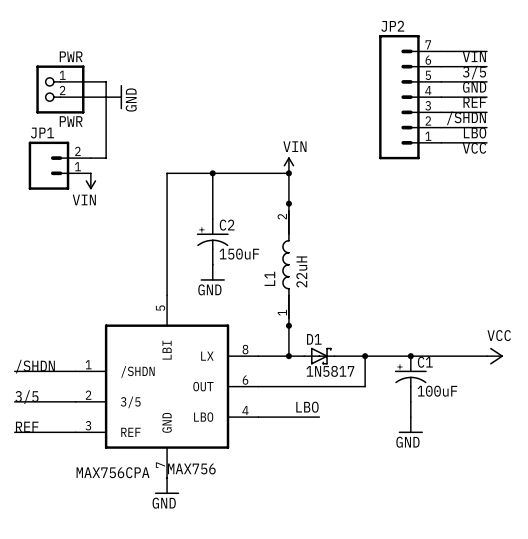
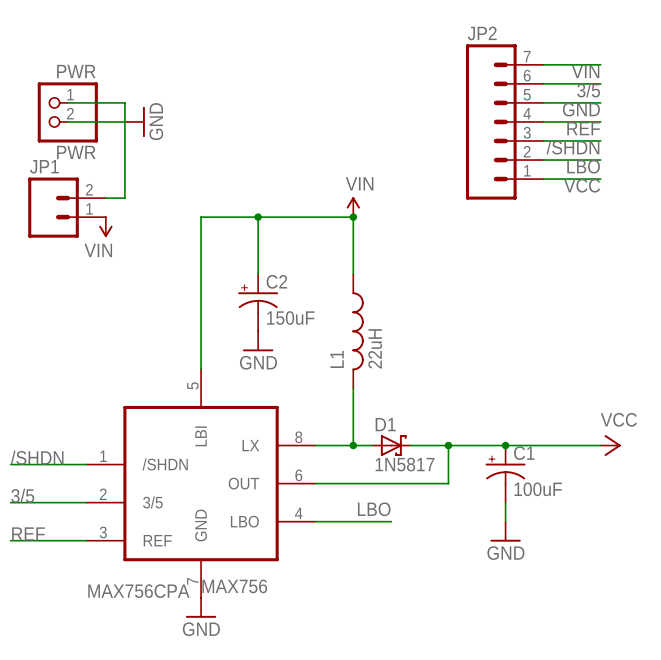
L1 symbol: [282, 203, 290, 326] -> [352, 274, 364, 389]
junction: (288, 203) -> none
junction: (288, 325) -> none

